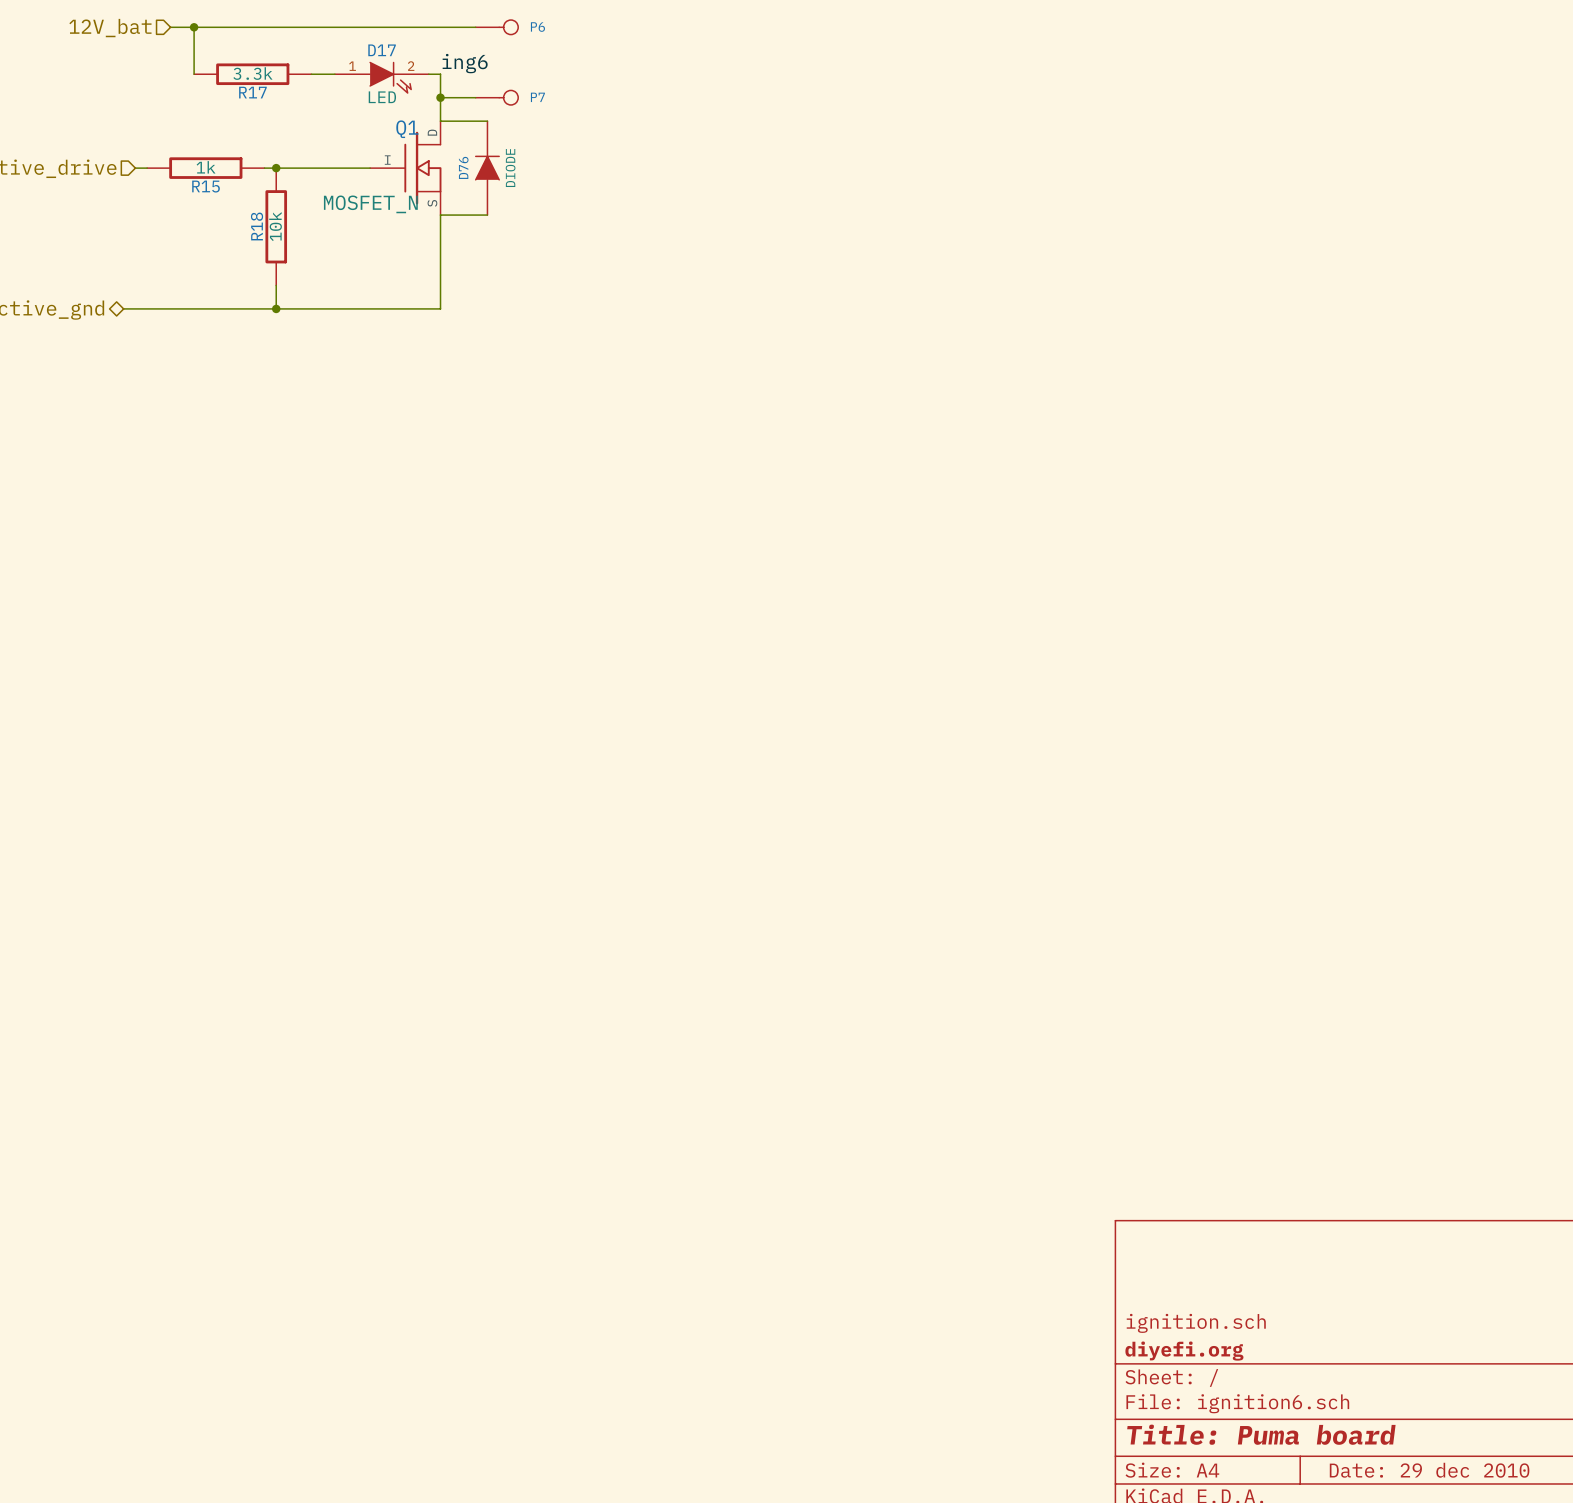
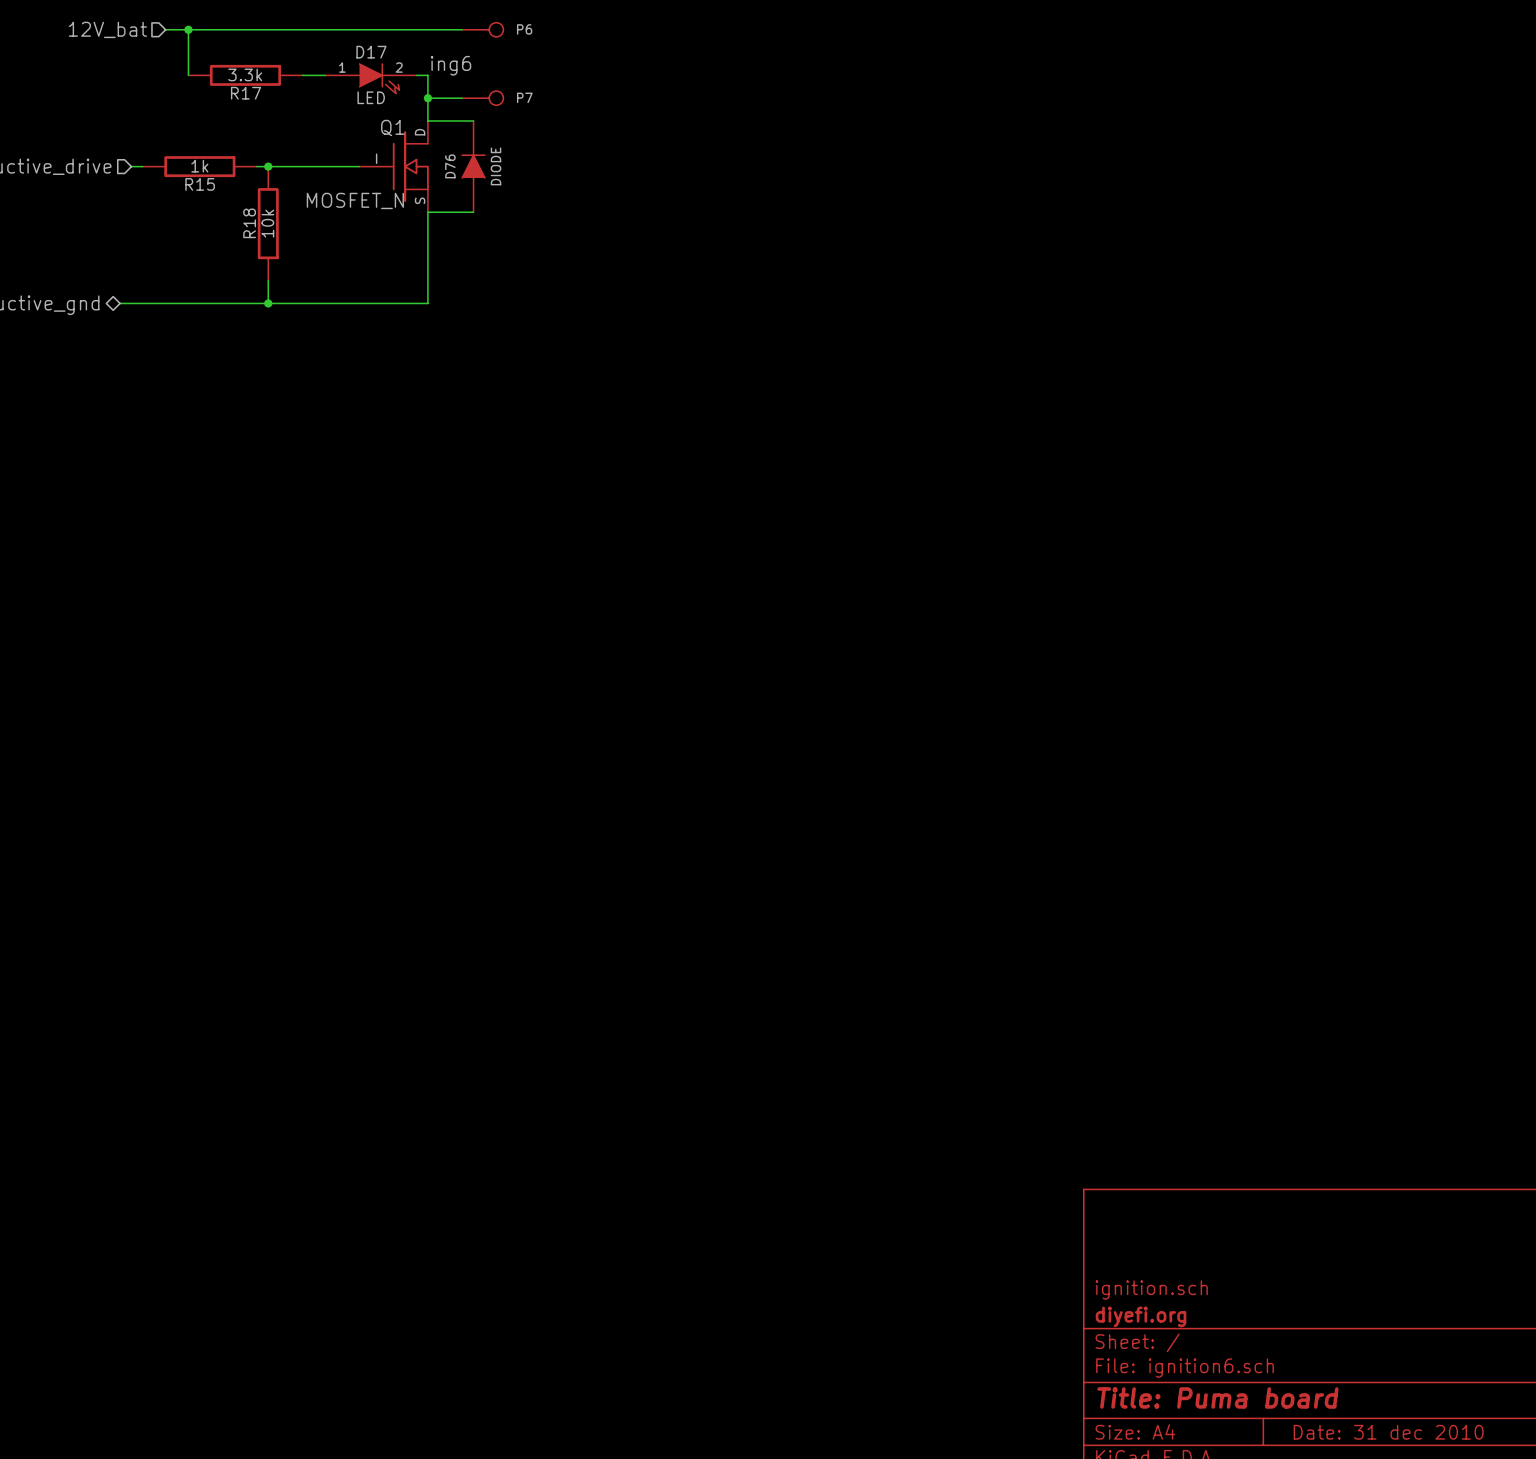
title block: Date: 29 dec 2010 (1429, 1470) -> Date: 31 dec 2010 (1388, 1432)

